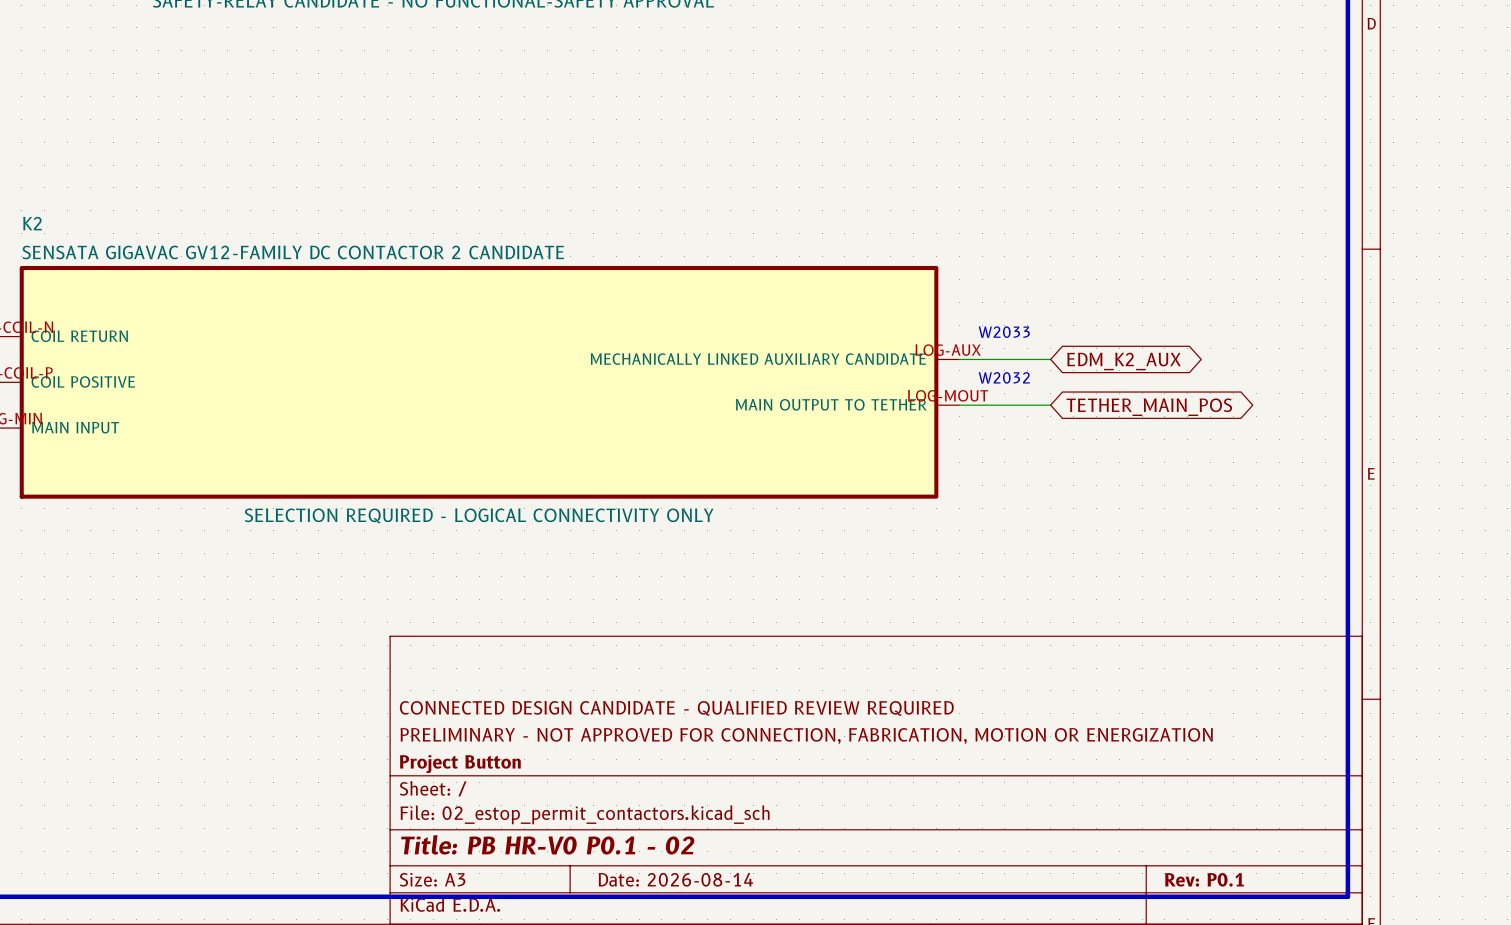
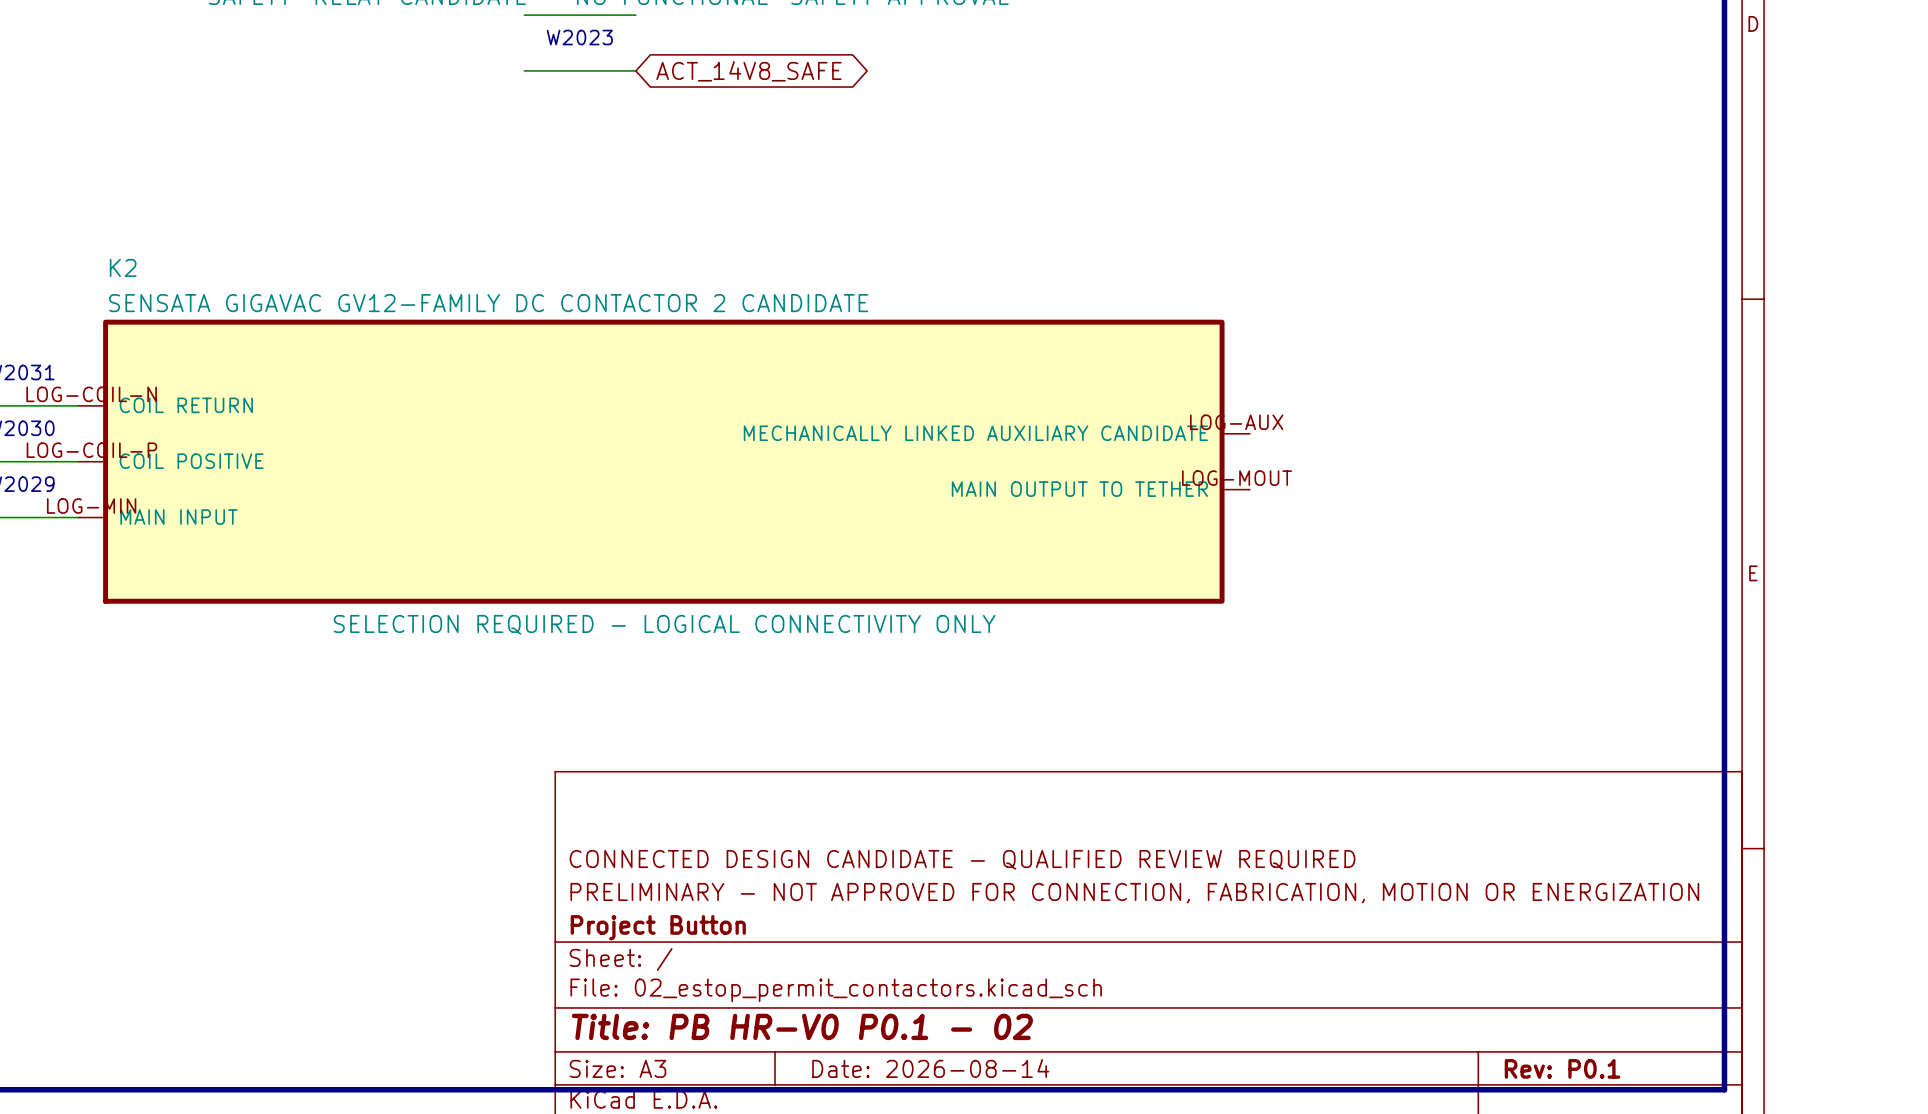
wire: none -> (524, 15) (635, 15)
text: none -> W2023 (579, 37)
wire: none -> (524, 70) (635, 70)
global label: none -> ACT_14V8_SAFE (748, 71)
text: W2033 (1004, 332) -> none
wire: (959, 359) (1050, 359) -> none
global label: EDM_K2_AUX (1124, 361) -> none
text: W2032 (1004, 377) -> none
wire: (959, 405) (1050, 405) -> none
global label: TETHER_MAIN_POS (1149, 407) -> none

